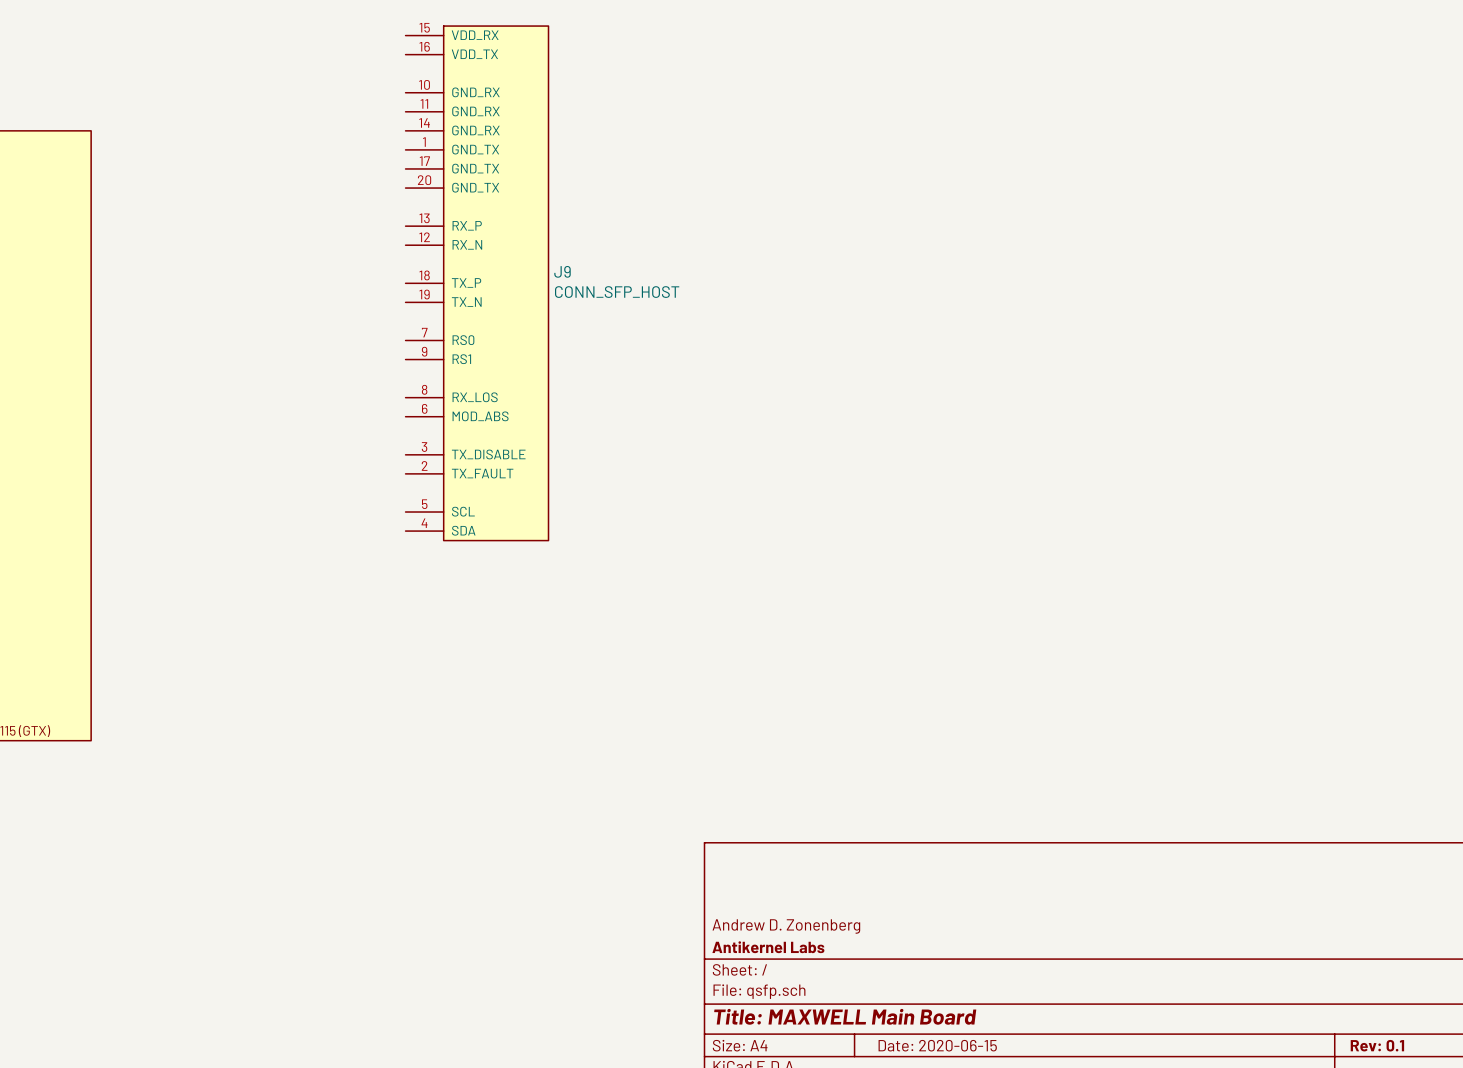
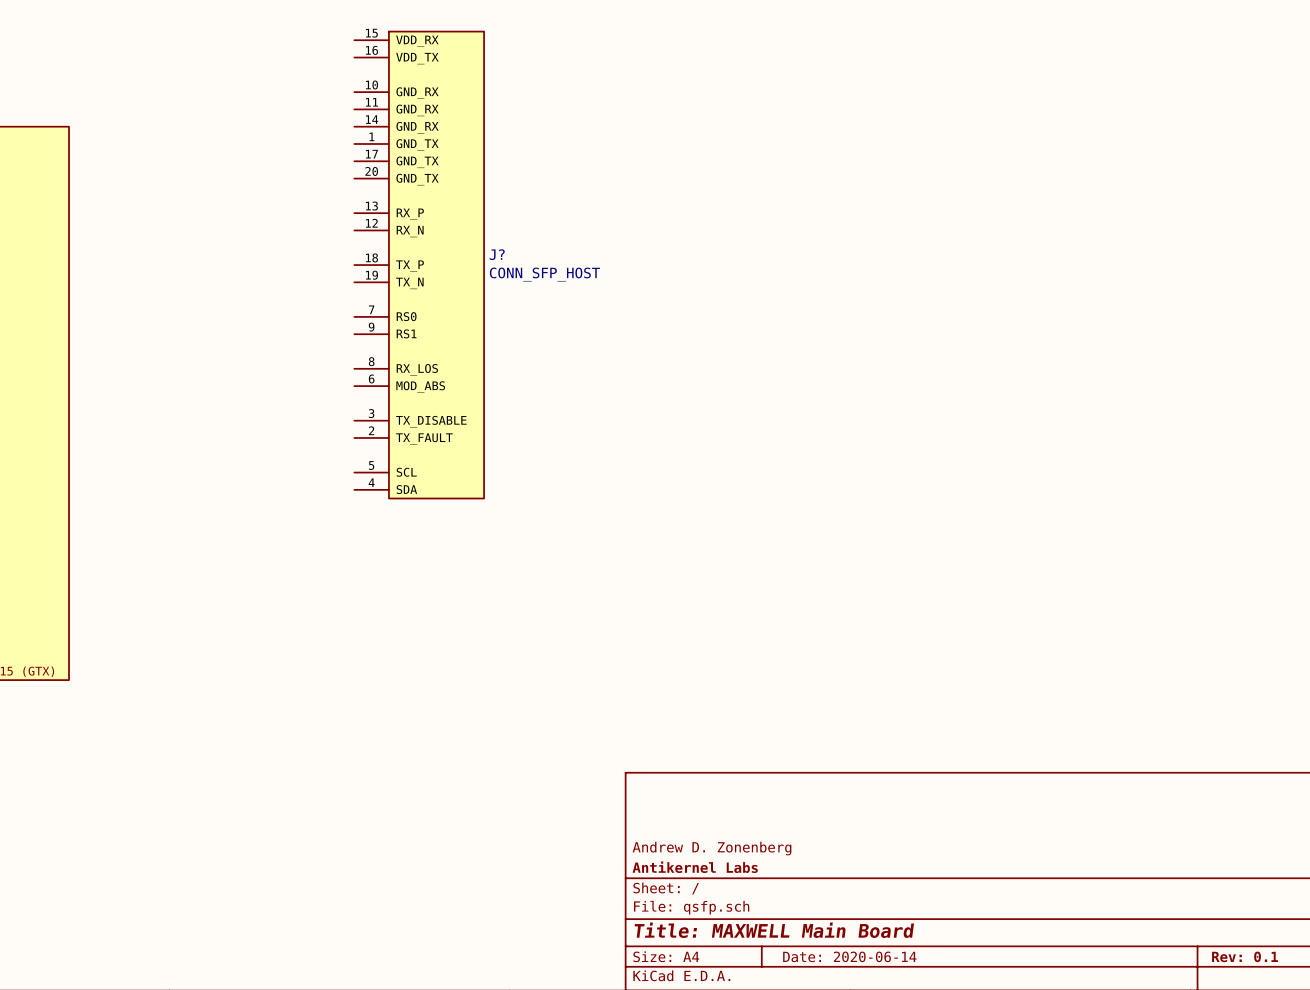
J9 name: J9 (562, 271) -> J? (497, 254)
title block: Date: 2020-06-15 (937, 1045) -> Date: 2020-06-14 (849, 956)

